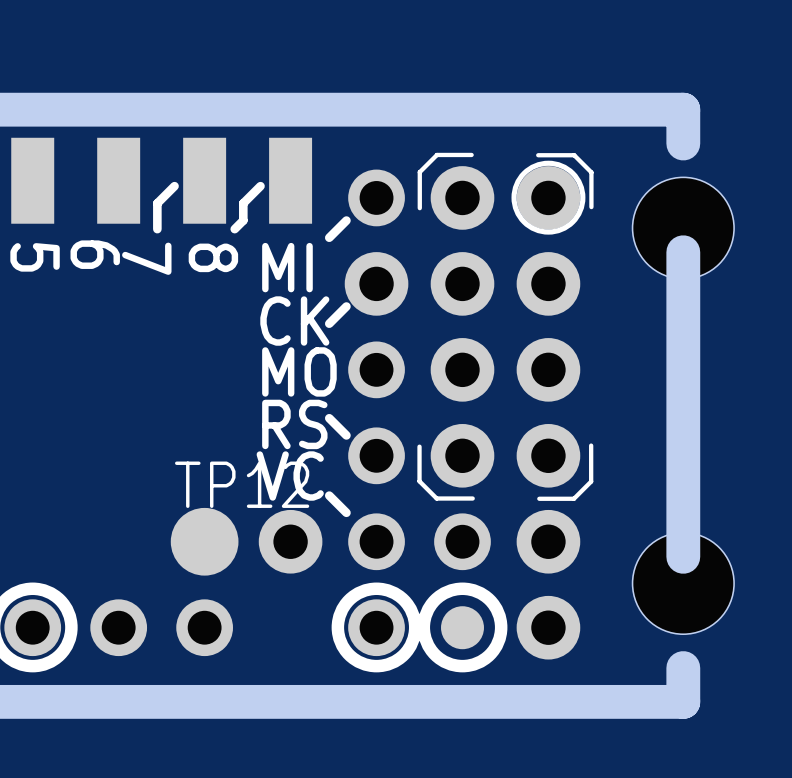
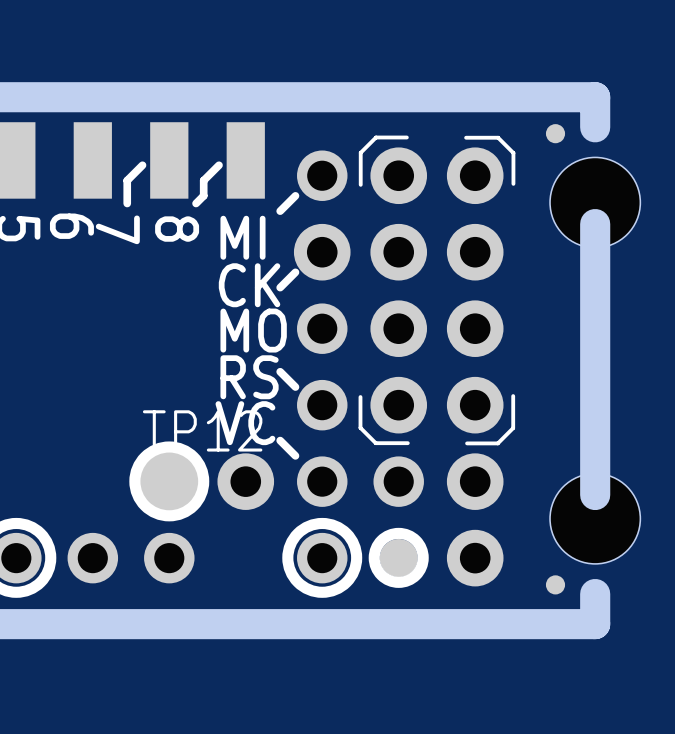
part: none -> (555, 133)
drawing: [511, 160, 586, 235] -> none
drawing: none -> [368, 527, 429, 588]
drawing position: (462, 627) -> (169, 481)
part: none -> (555, 584)

